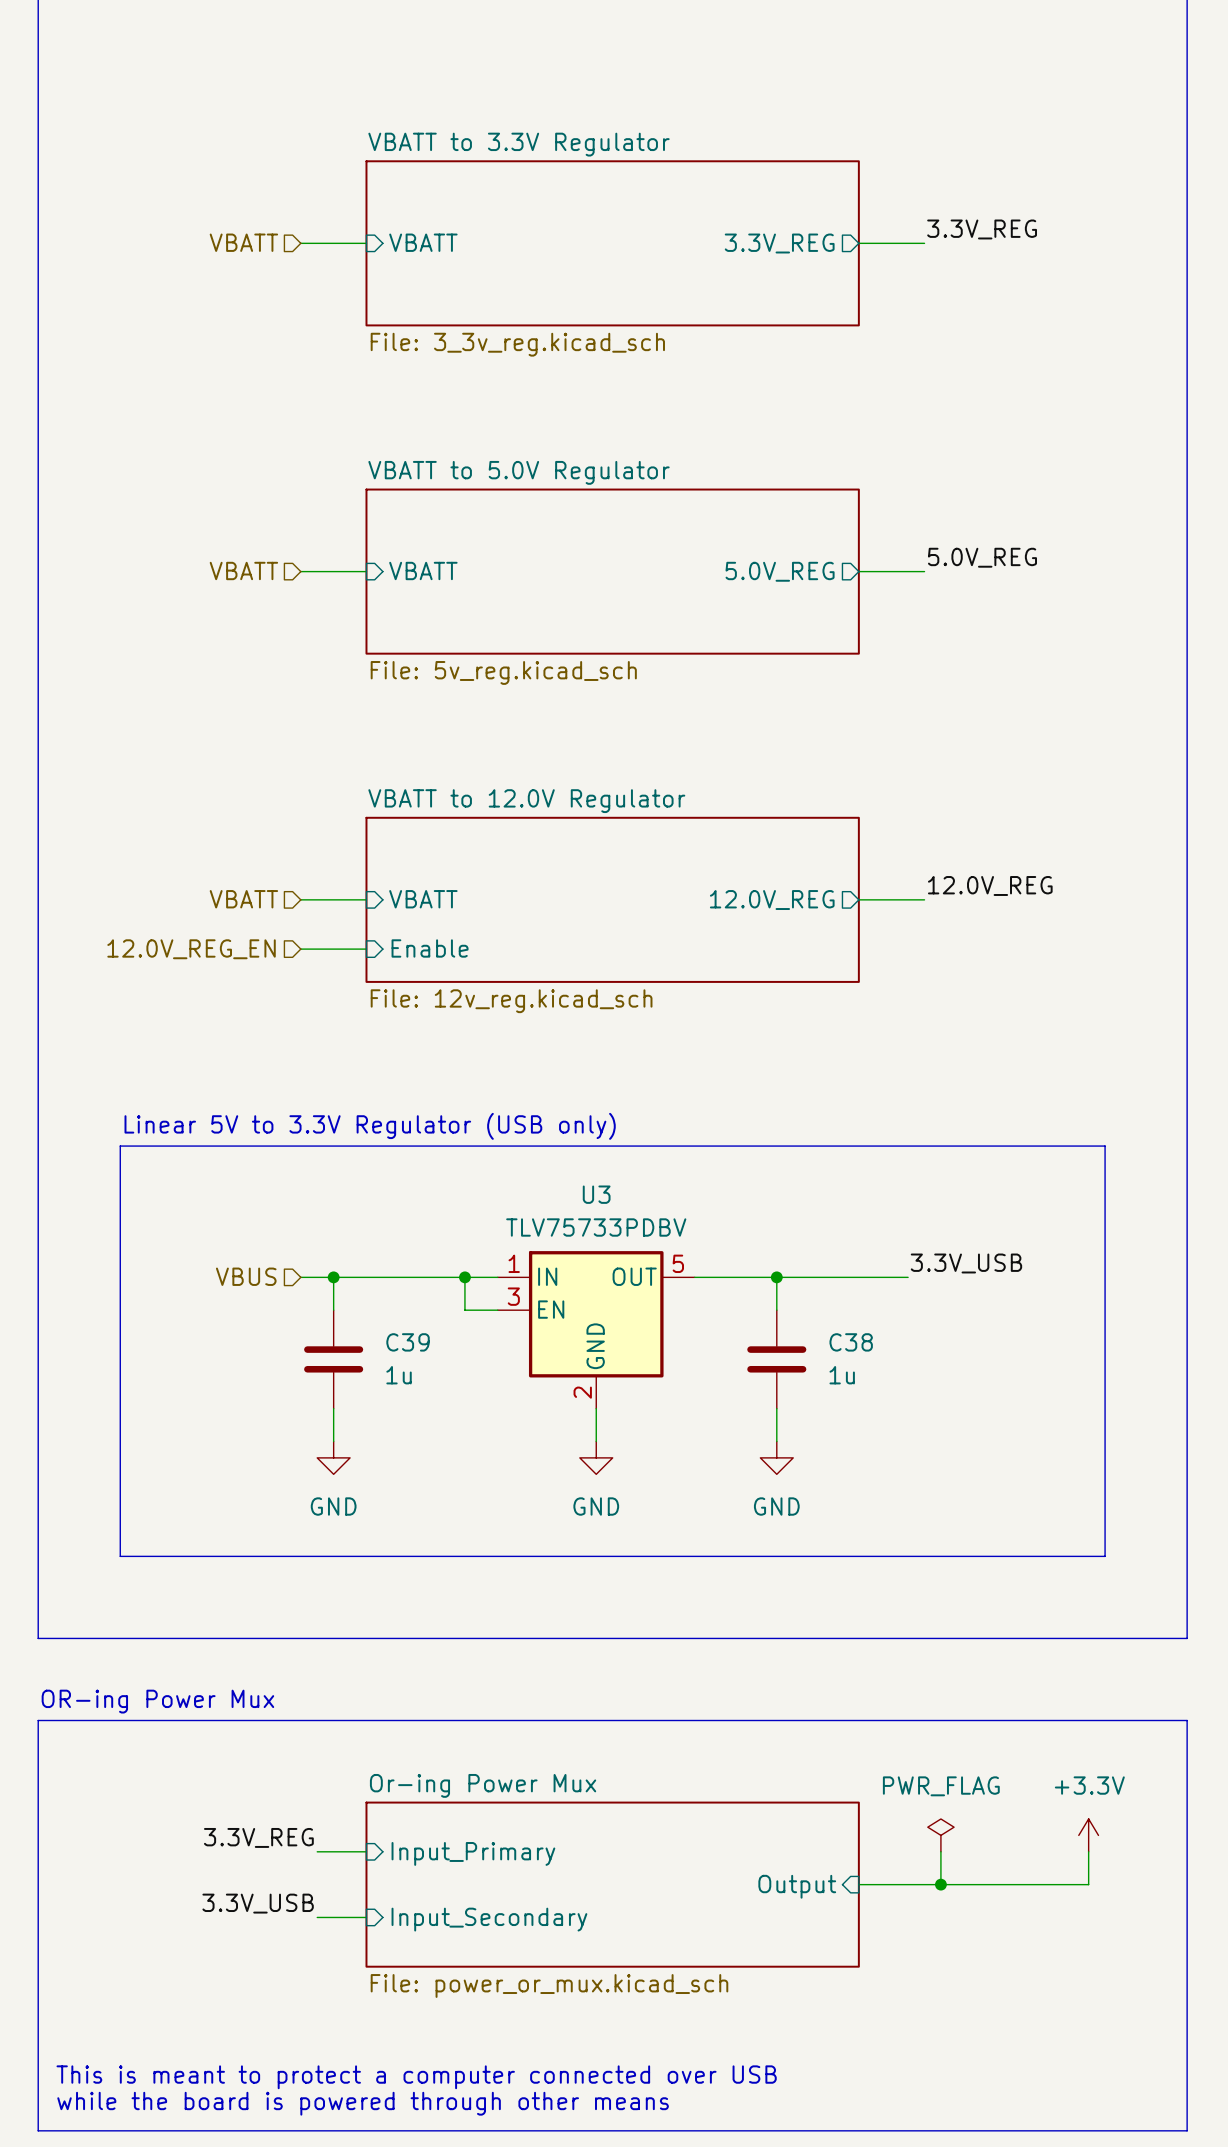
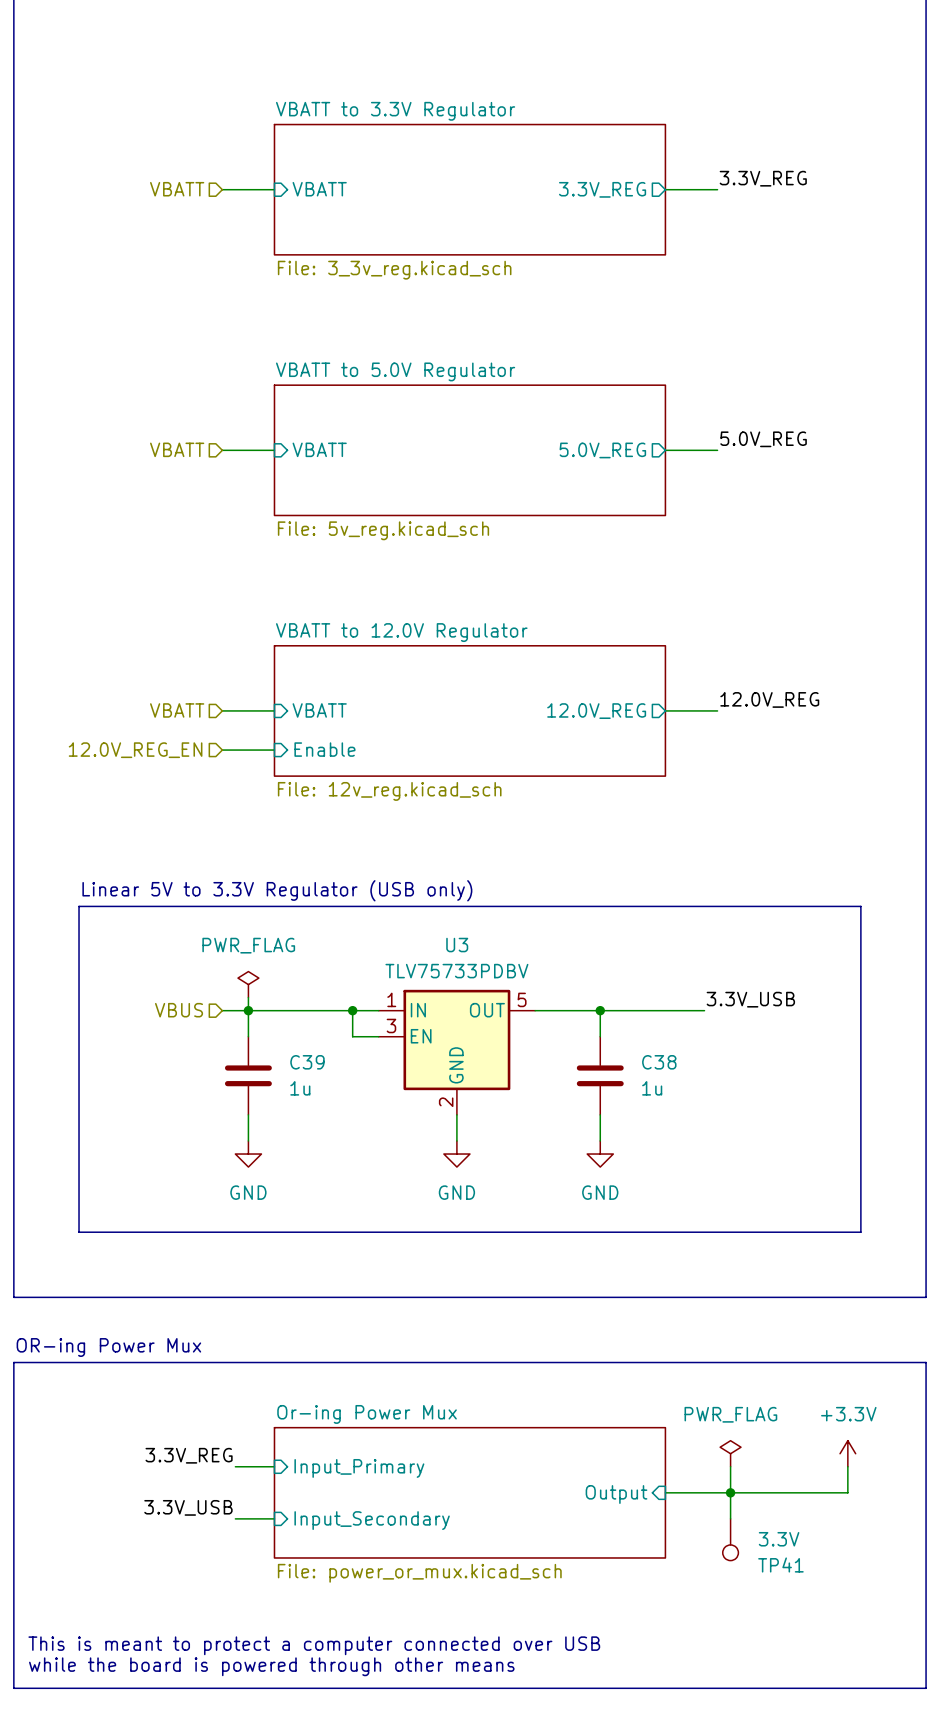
power symbol: none -> PWR_FLAG (248, 984)
wire: none -> (248, 997) (248, 1010)
wire: none -> (730, 1492) (730, 1518)
TP41: none -> 3.3V (730, 1539)

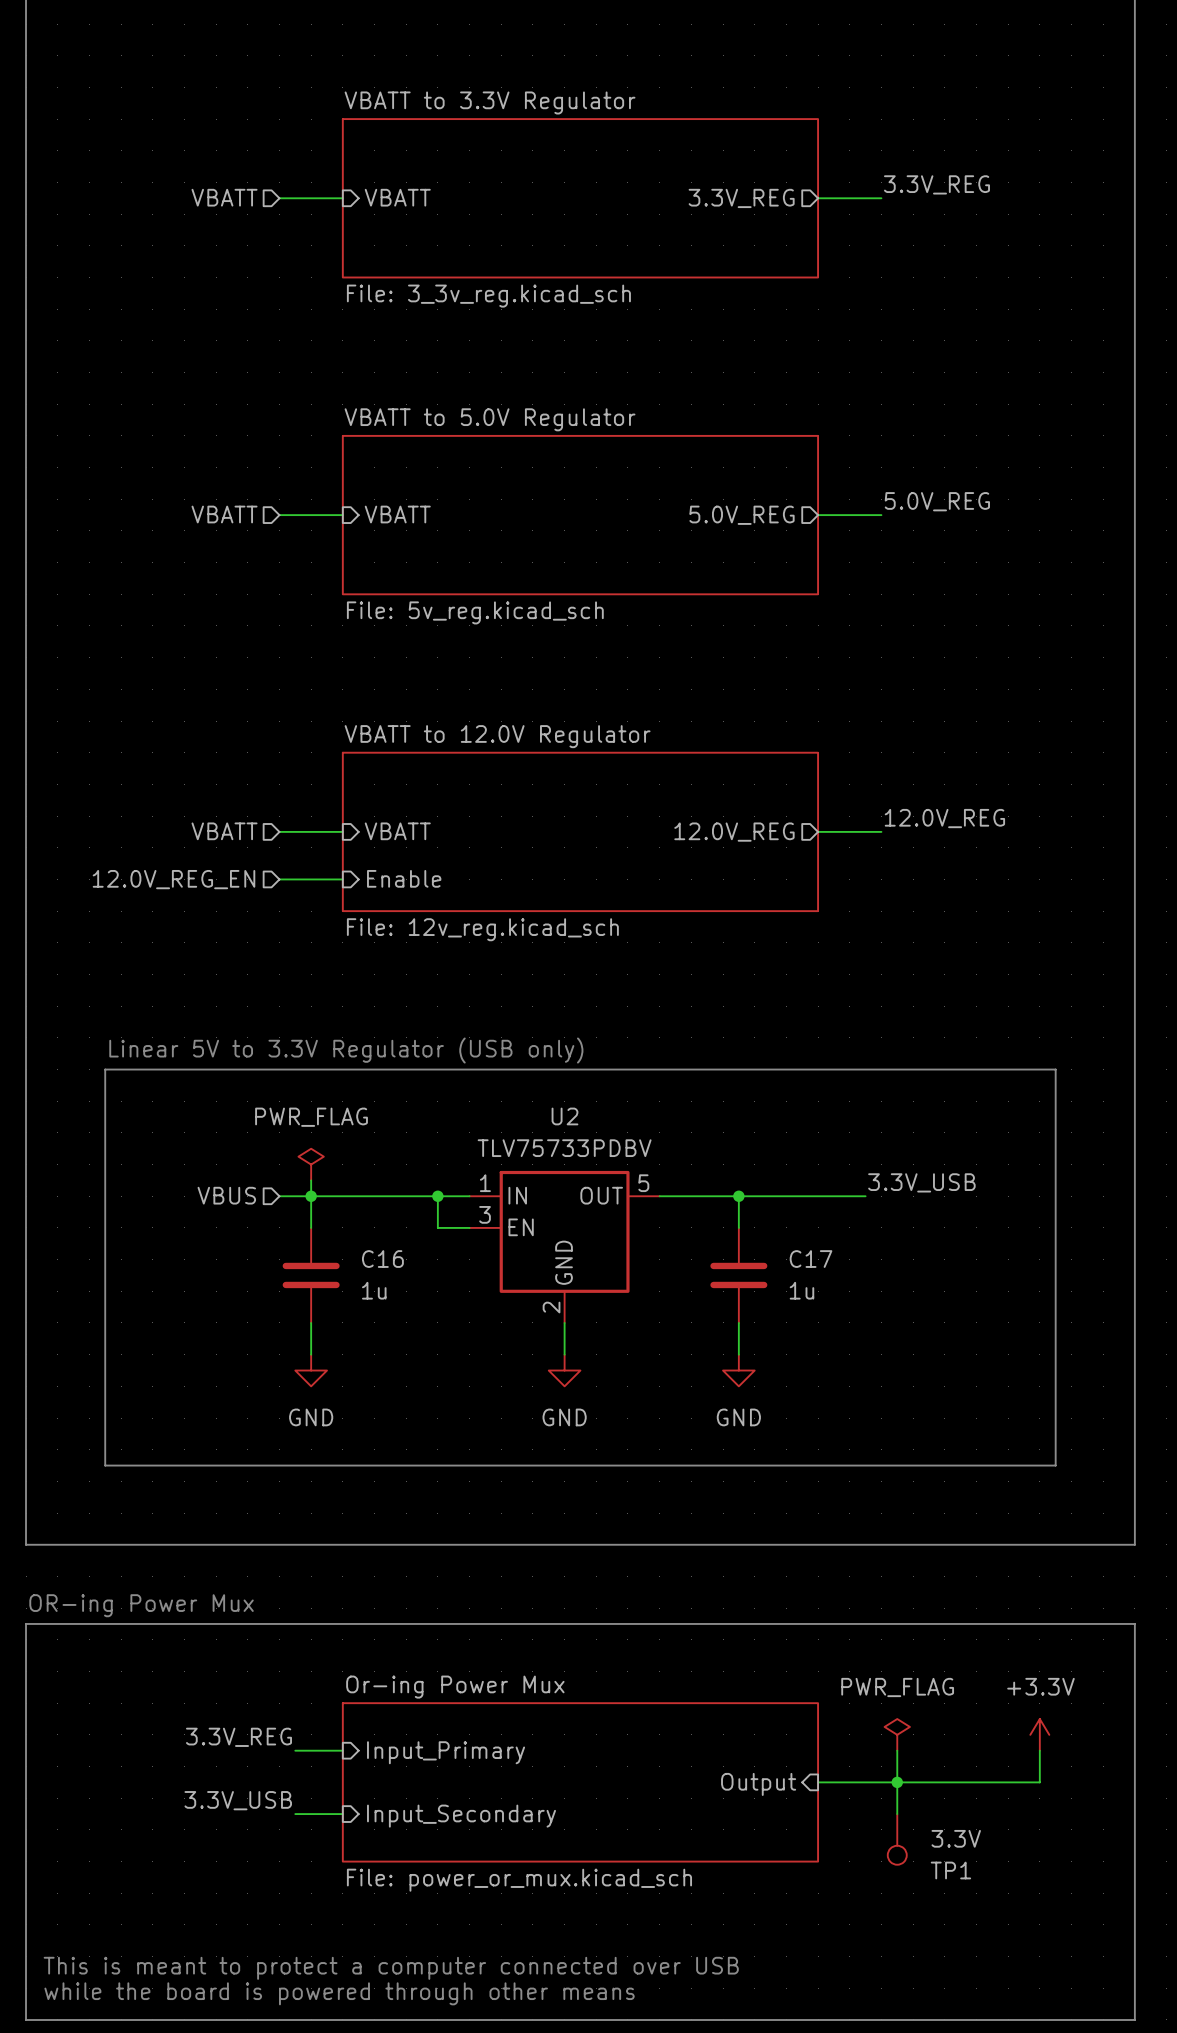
U3 name: U3 (457, 945) -> U2 (564, 1116)
C39 name: C39 (307, 1062) -> C16 (382, 1259)
C38 name: C38 (659, 1062) -> C17 (811, 1259)
TP41 name: TP41 (780, 1565) -> TP1 (950, 1870)

